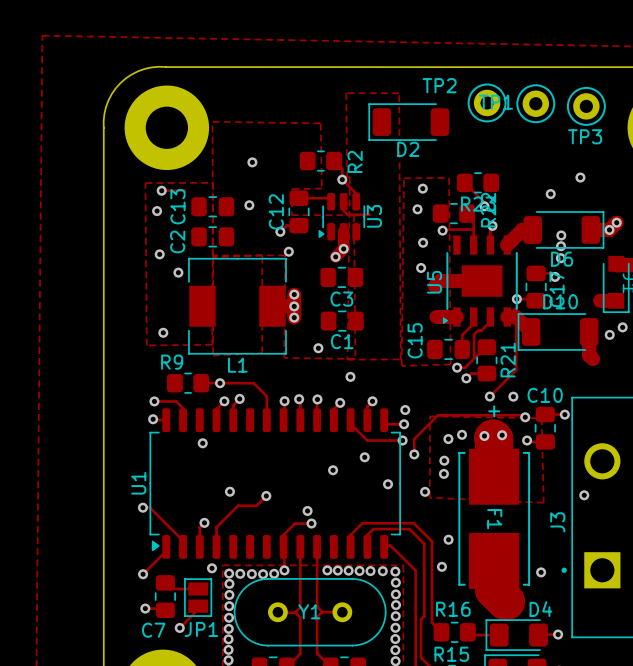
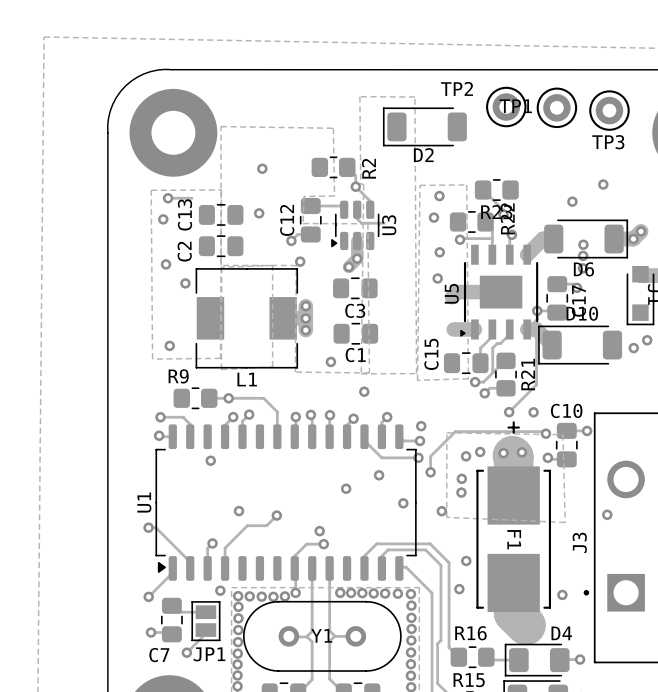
track: (600, 300) (616, 300) -> none
track: (589, 331) (589, 355) (592, 359) -> none

